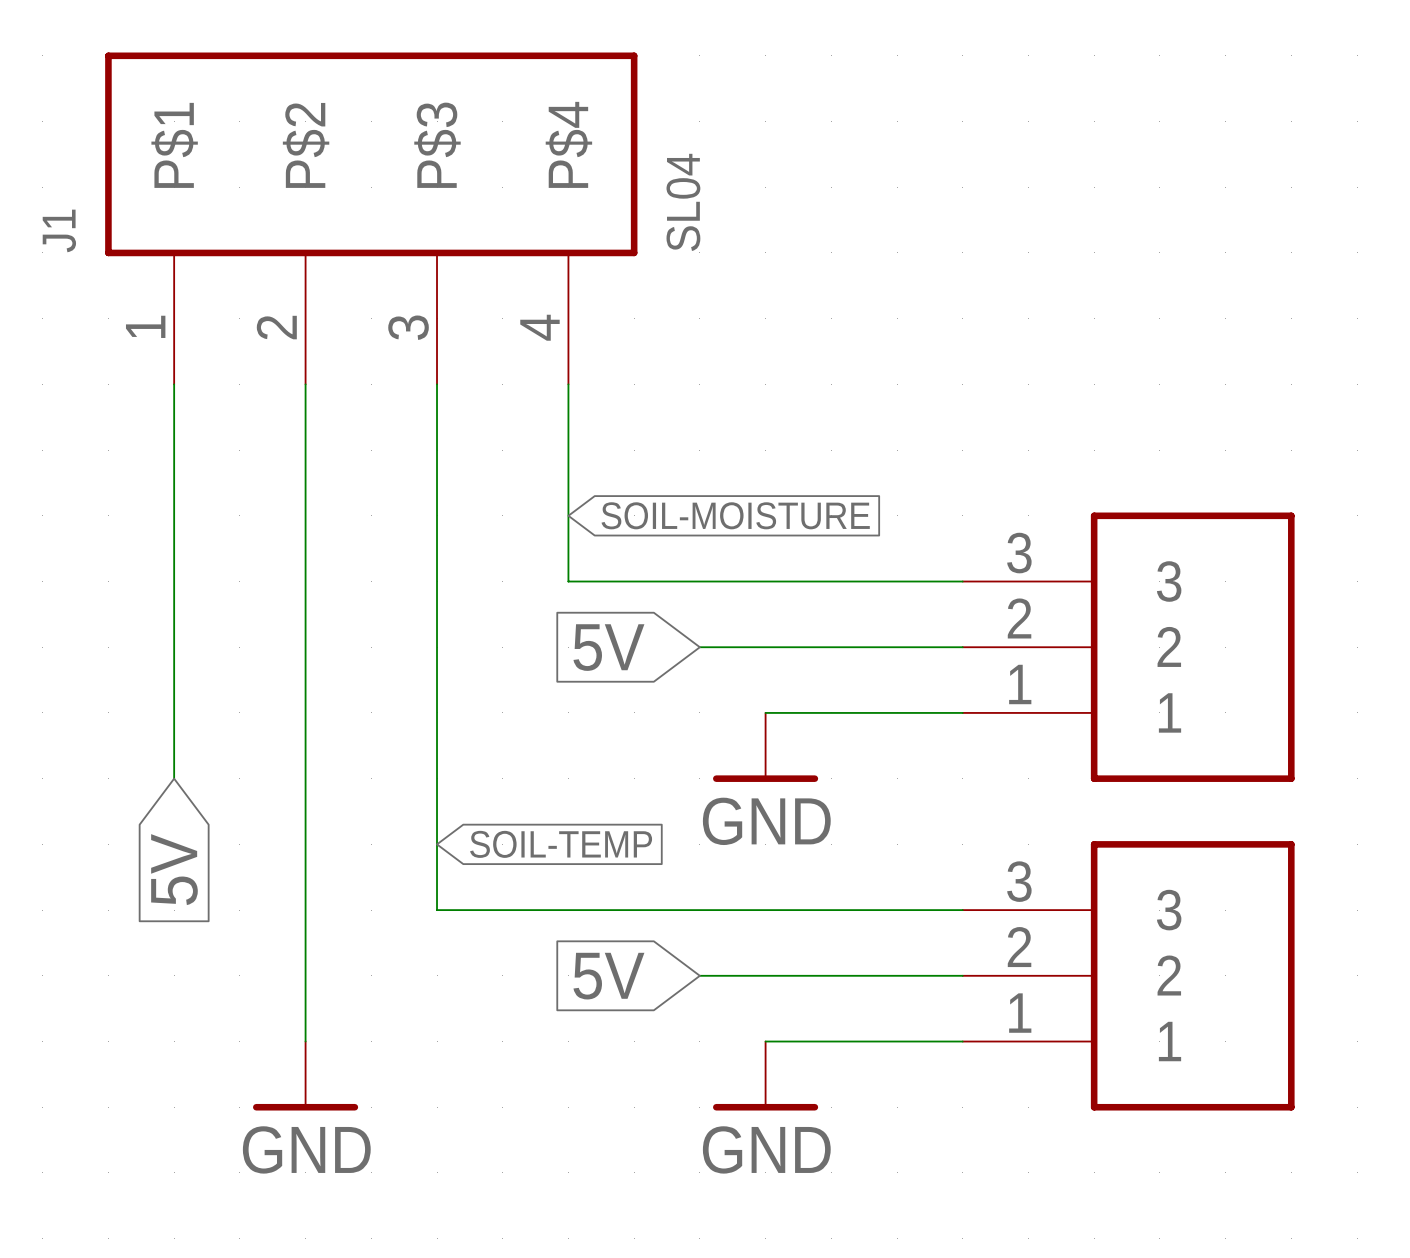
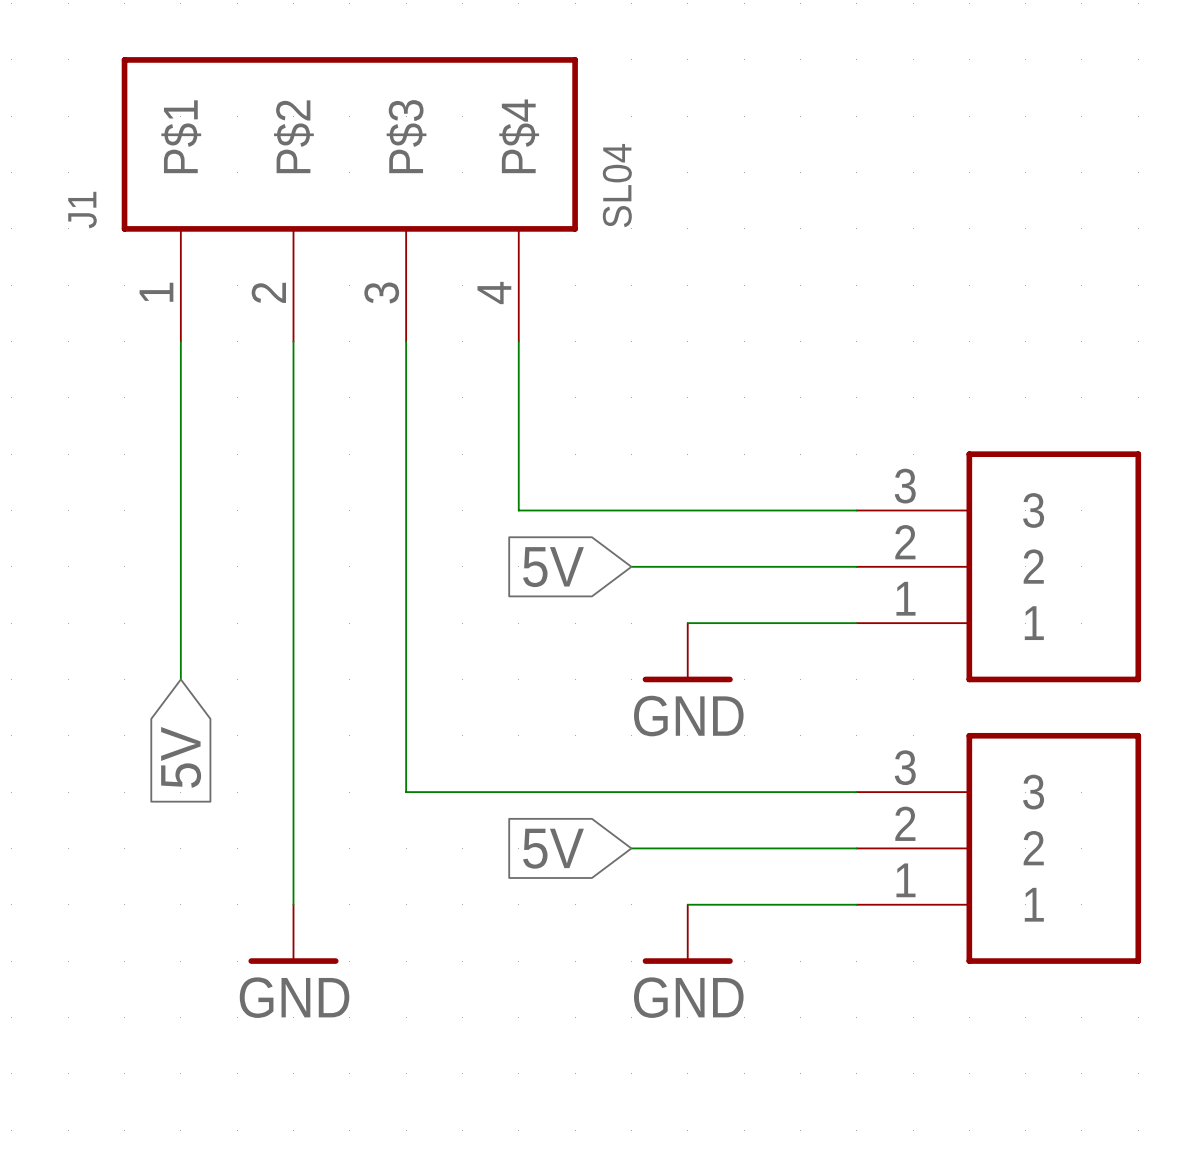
global label: SOIL-MOISTURE (735, 515) -> none
global label: SOIL-TEMP (561, 844) -> none

